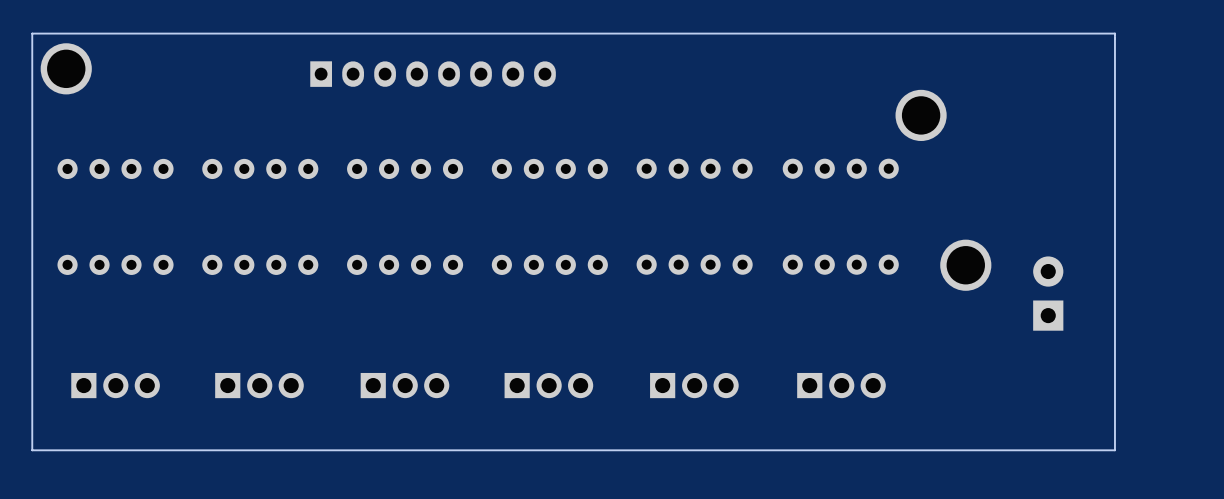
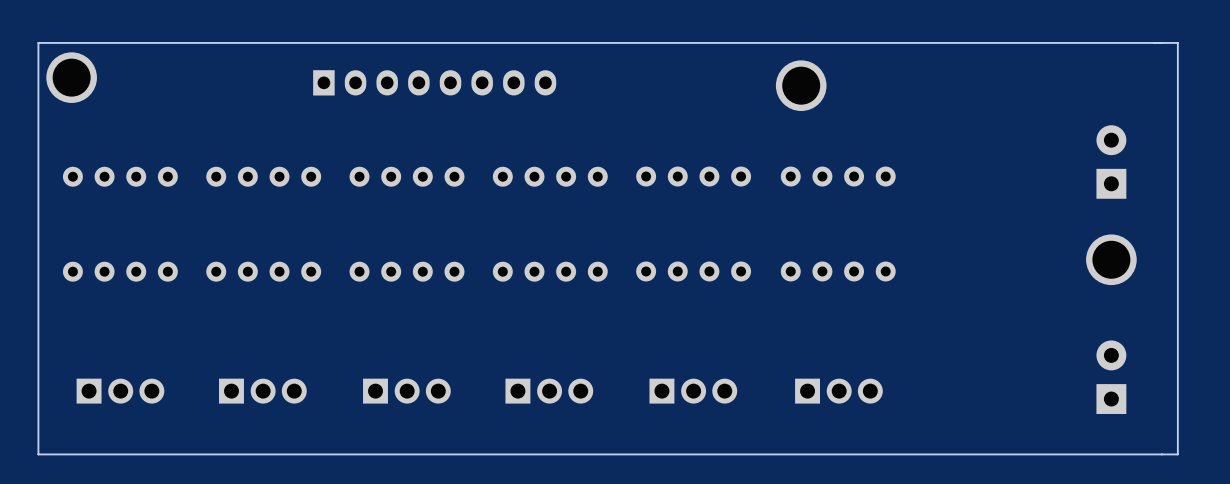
board edge: (1114, 33) (32, 33) (32, 450) (1114, 450) (1114, 33) -> (1177, 42) (1177, 454) (38, 454) (38, 42) (1177, 42)
part: none -> (801, 85)
part: (921, 115) -> none
part: none -> (1111, 162)
part: none -> (1111, 259)
part: (965, 265) -> none
part: (1048, 293) -> none
part: none -> (1111, 377)

